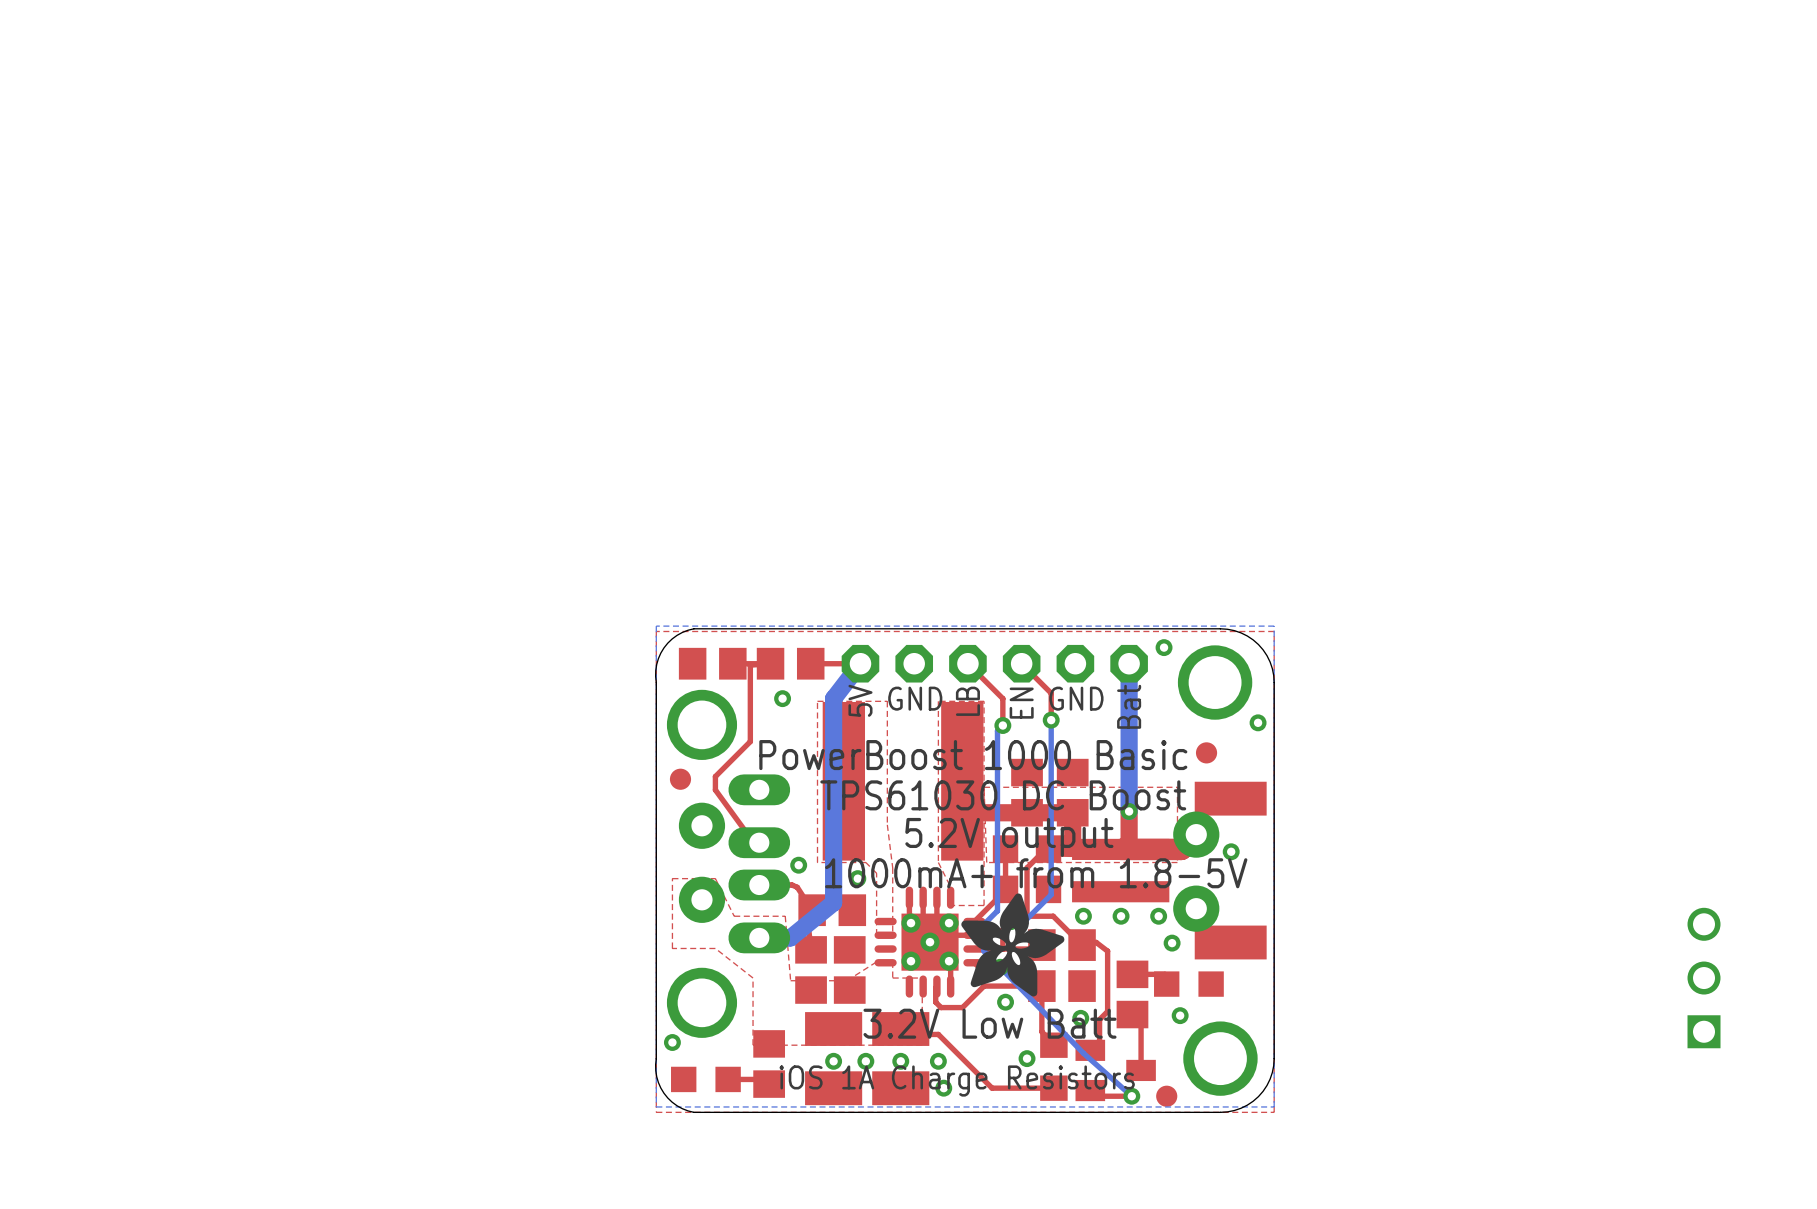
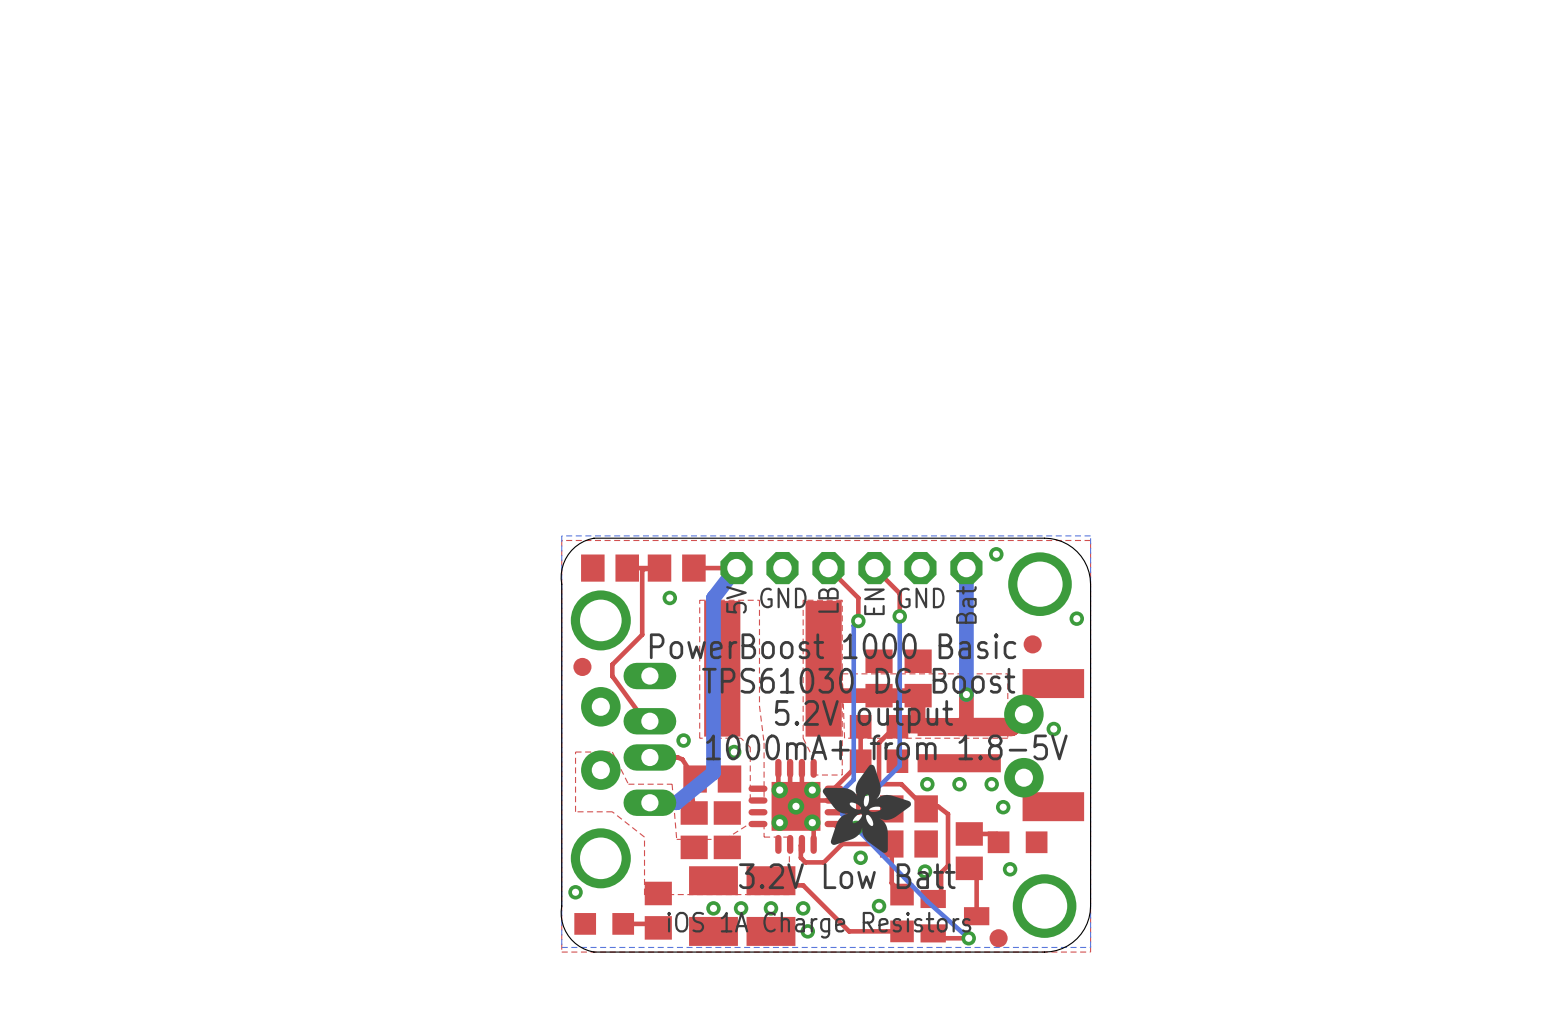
part: (1704, 978) -> none

